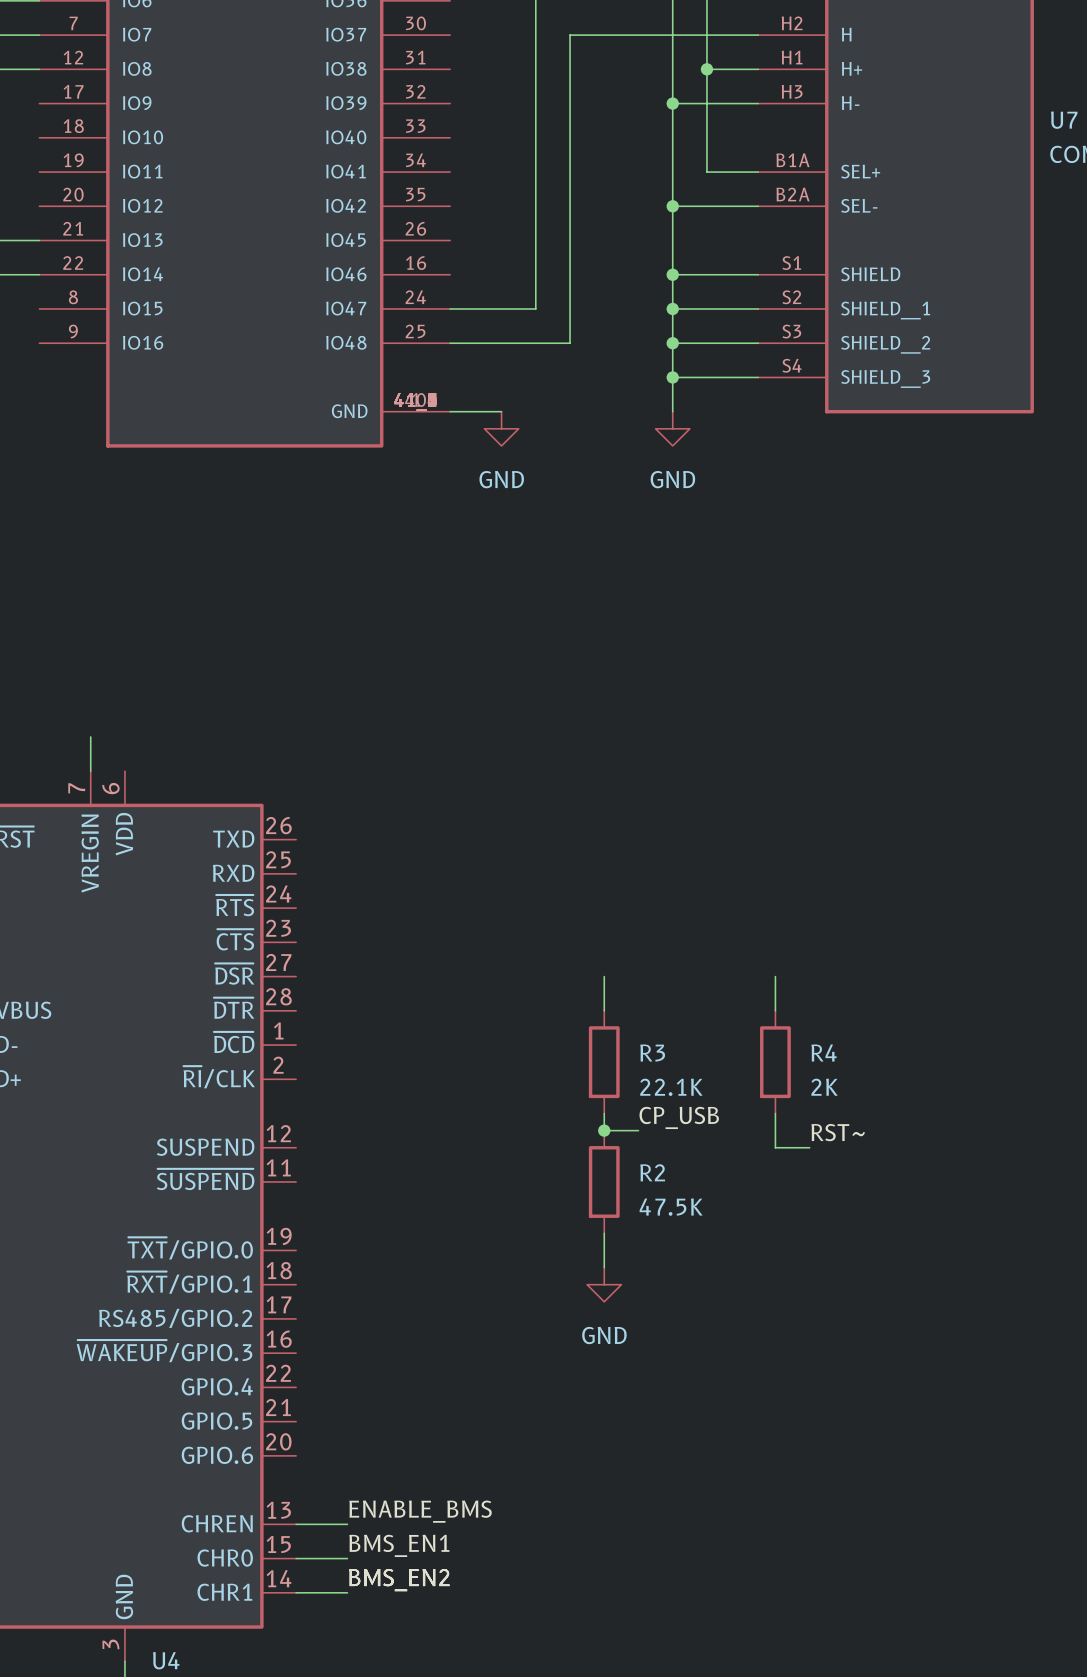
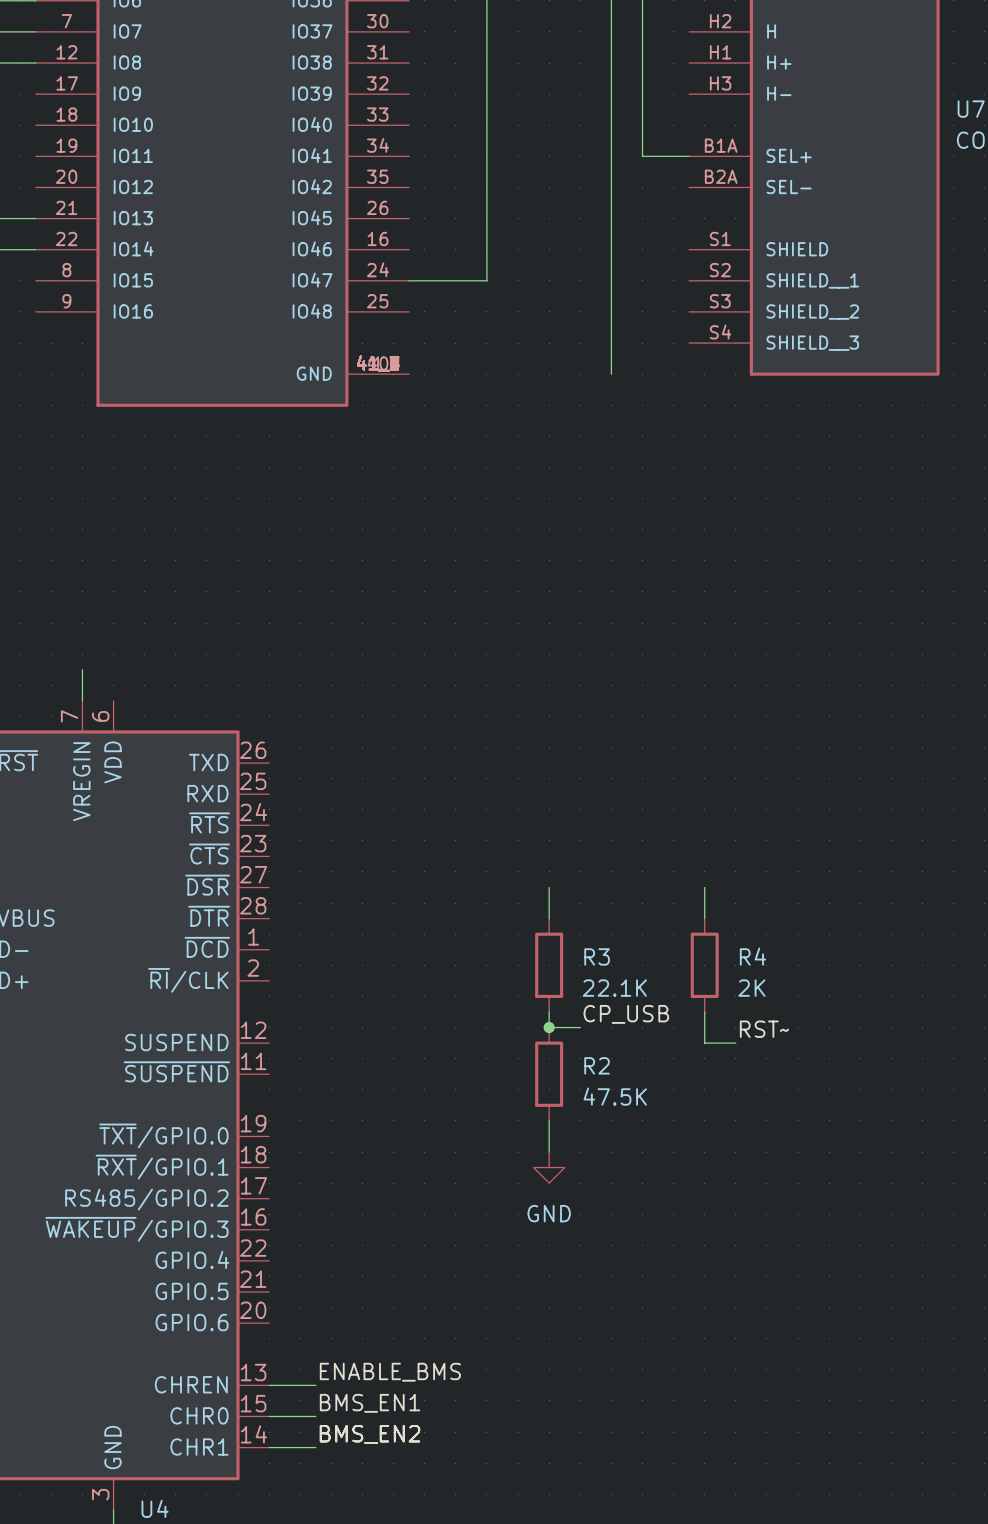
wire: (758, 35) (570, 35) (570, 343) (450, 343) -> none
wire: (706, 69) (758, 69) -> none
junction: (706, 69) -> none
wire: (672, 103) (758, 103) -> none
junction: (672, 103) -> none
wire: (672, 206) (758, 206) -> none
junction: (672, 206) -> none
wire: (672, 274) (758, 274) -> none
junction: (672, 274) -> none
wire: (672, 308) (758, 308) -> none
junction: (672, 308) -> none
wire: (672, 343) (758, 343) -> none
junction: (672, 343) -> none
wire: (672, 377) (758, 377) -> none
junction: (672, 377) -> none
wire: (450, 411) (501, 411) -> none
power symbol: GND (501, 428) -> none
power symbol: GND (672, 428) -> none

